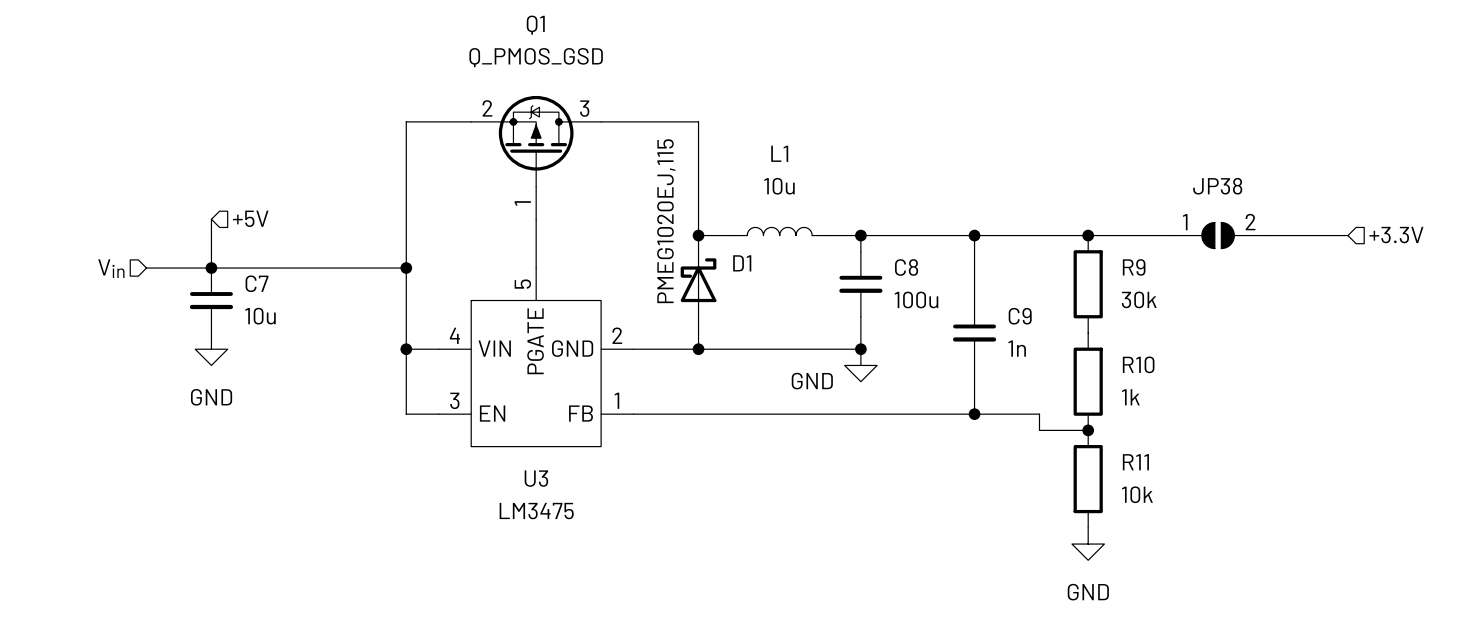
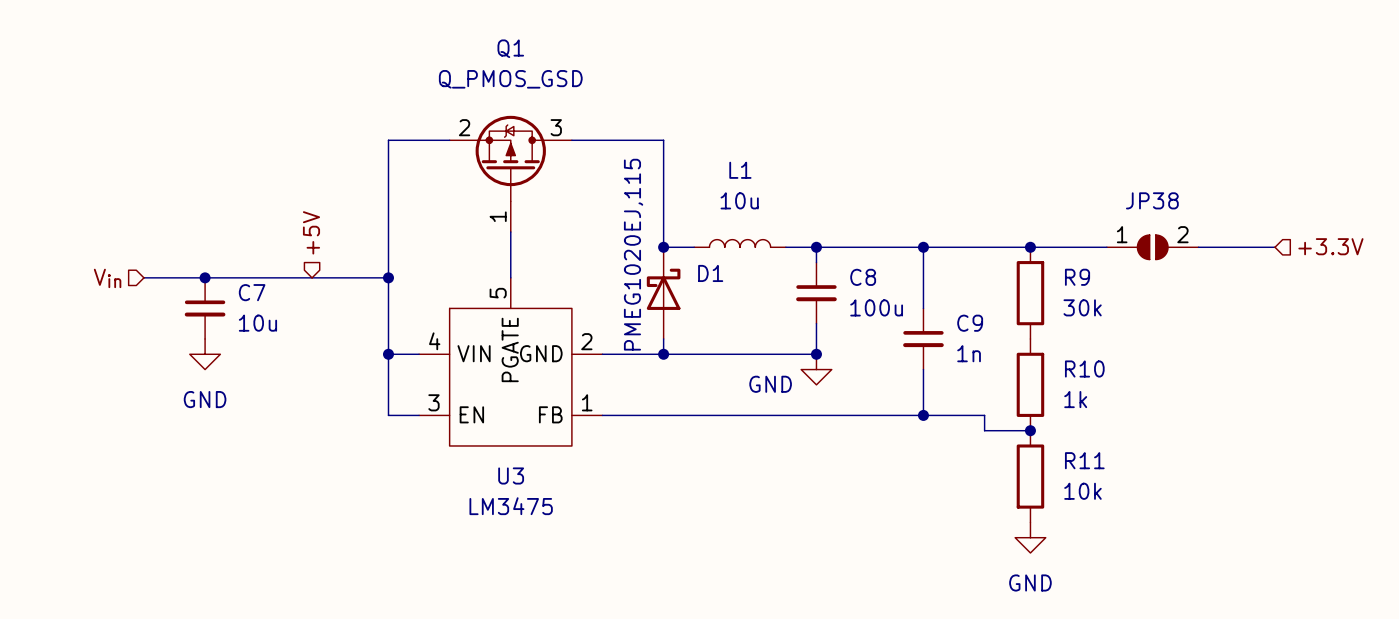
hierarchical label rotation: 0° (250, 218) -> 90° counterclockwise (311, 232)
hierarchical label position: +5V (250, 218) -> +5V (311, 232)
wire: (211, 219) (211, 268) -> none

